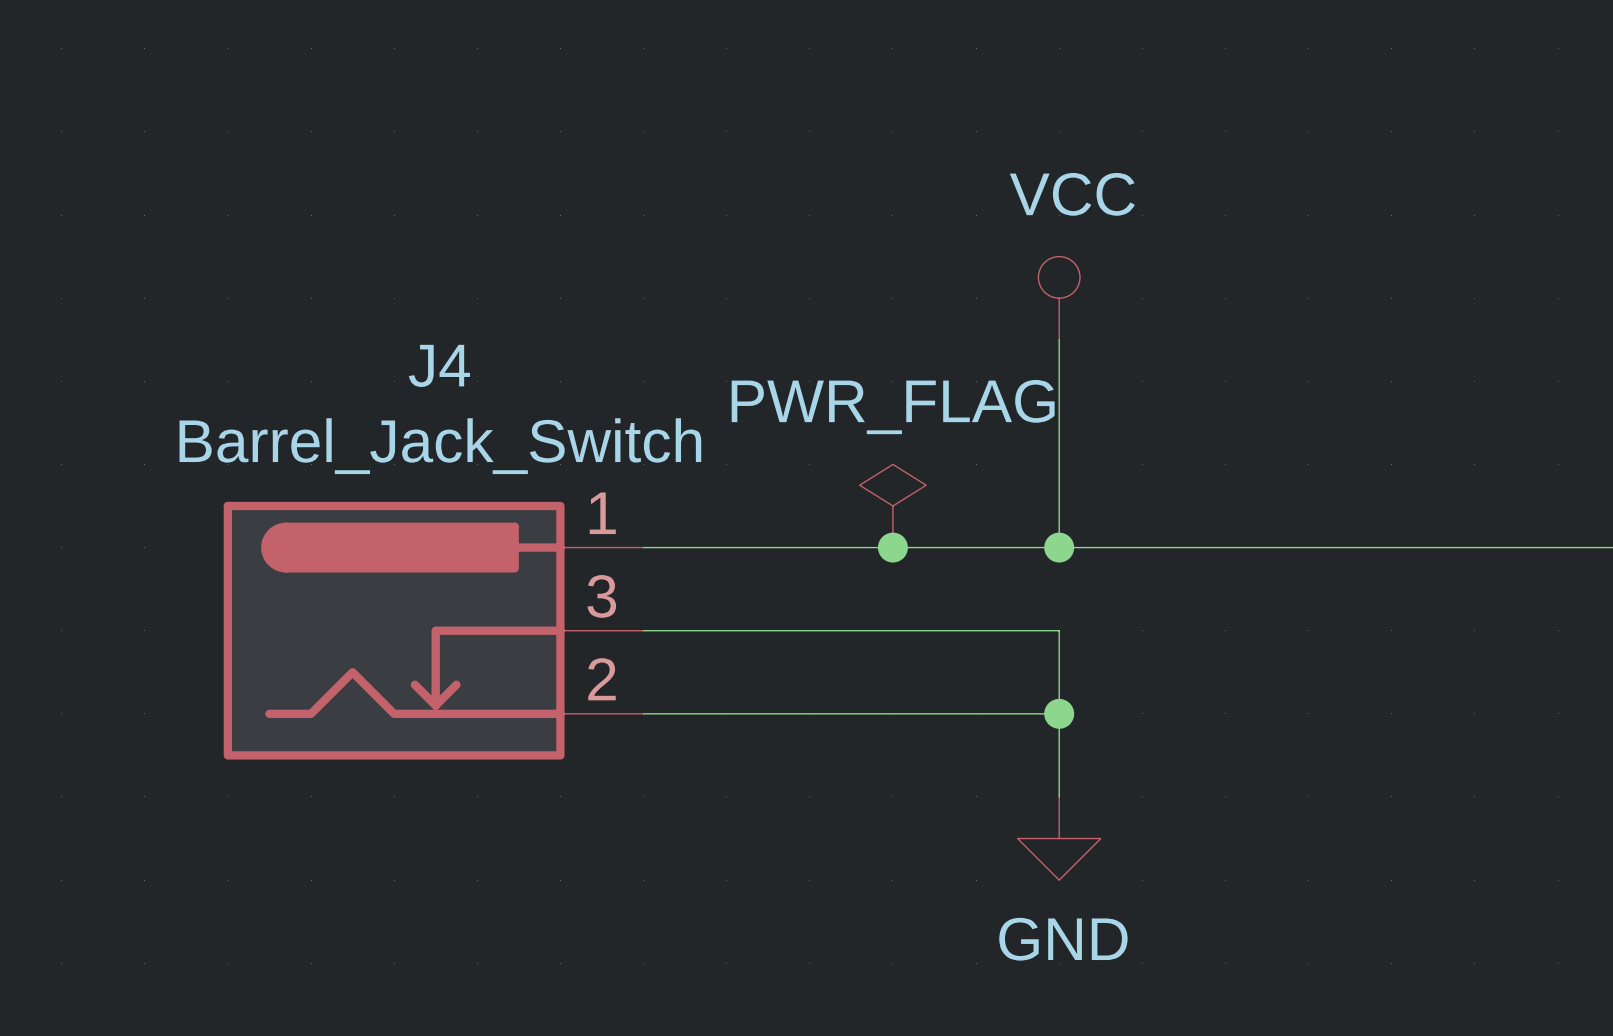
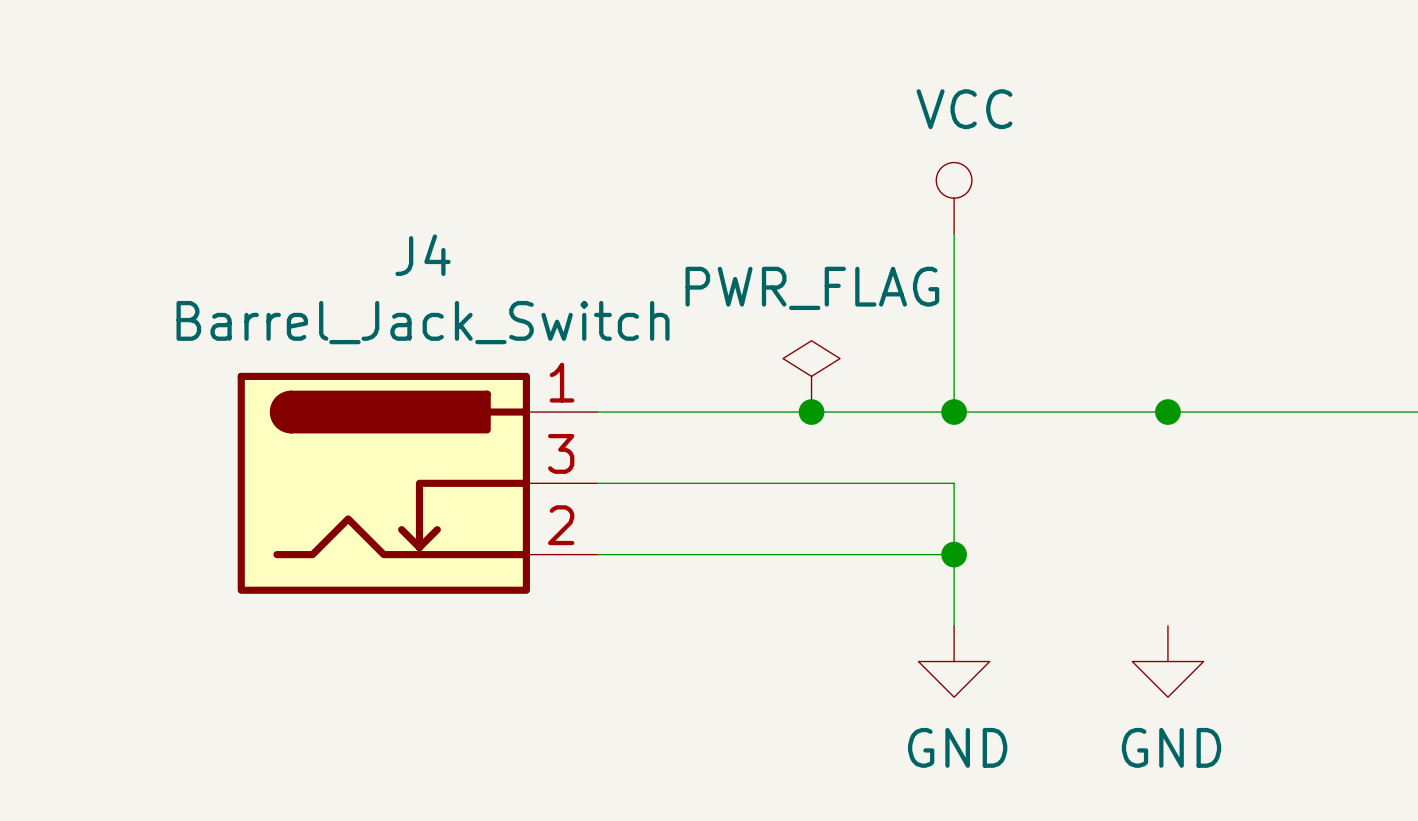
junction: none -> (1167, 412)
power symbol: none -> GND (1167, 661)

